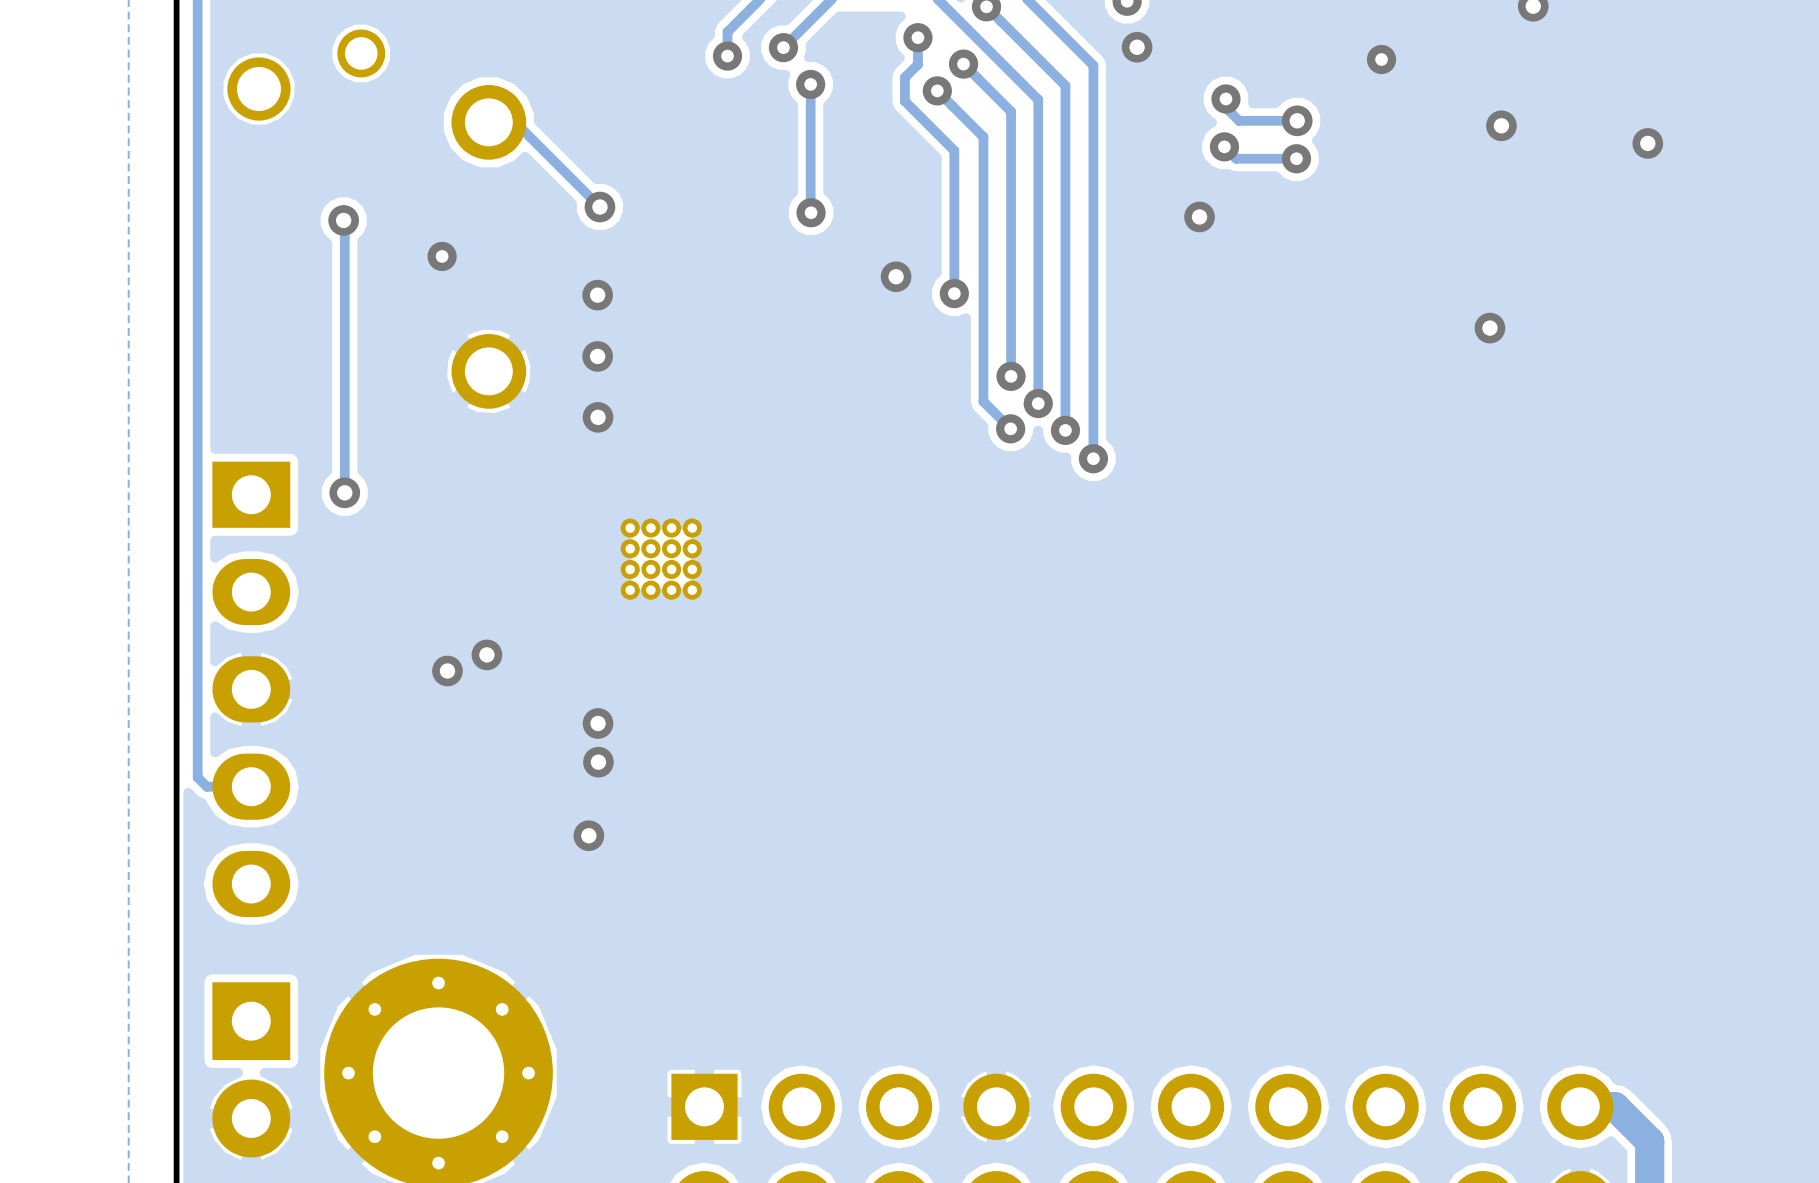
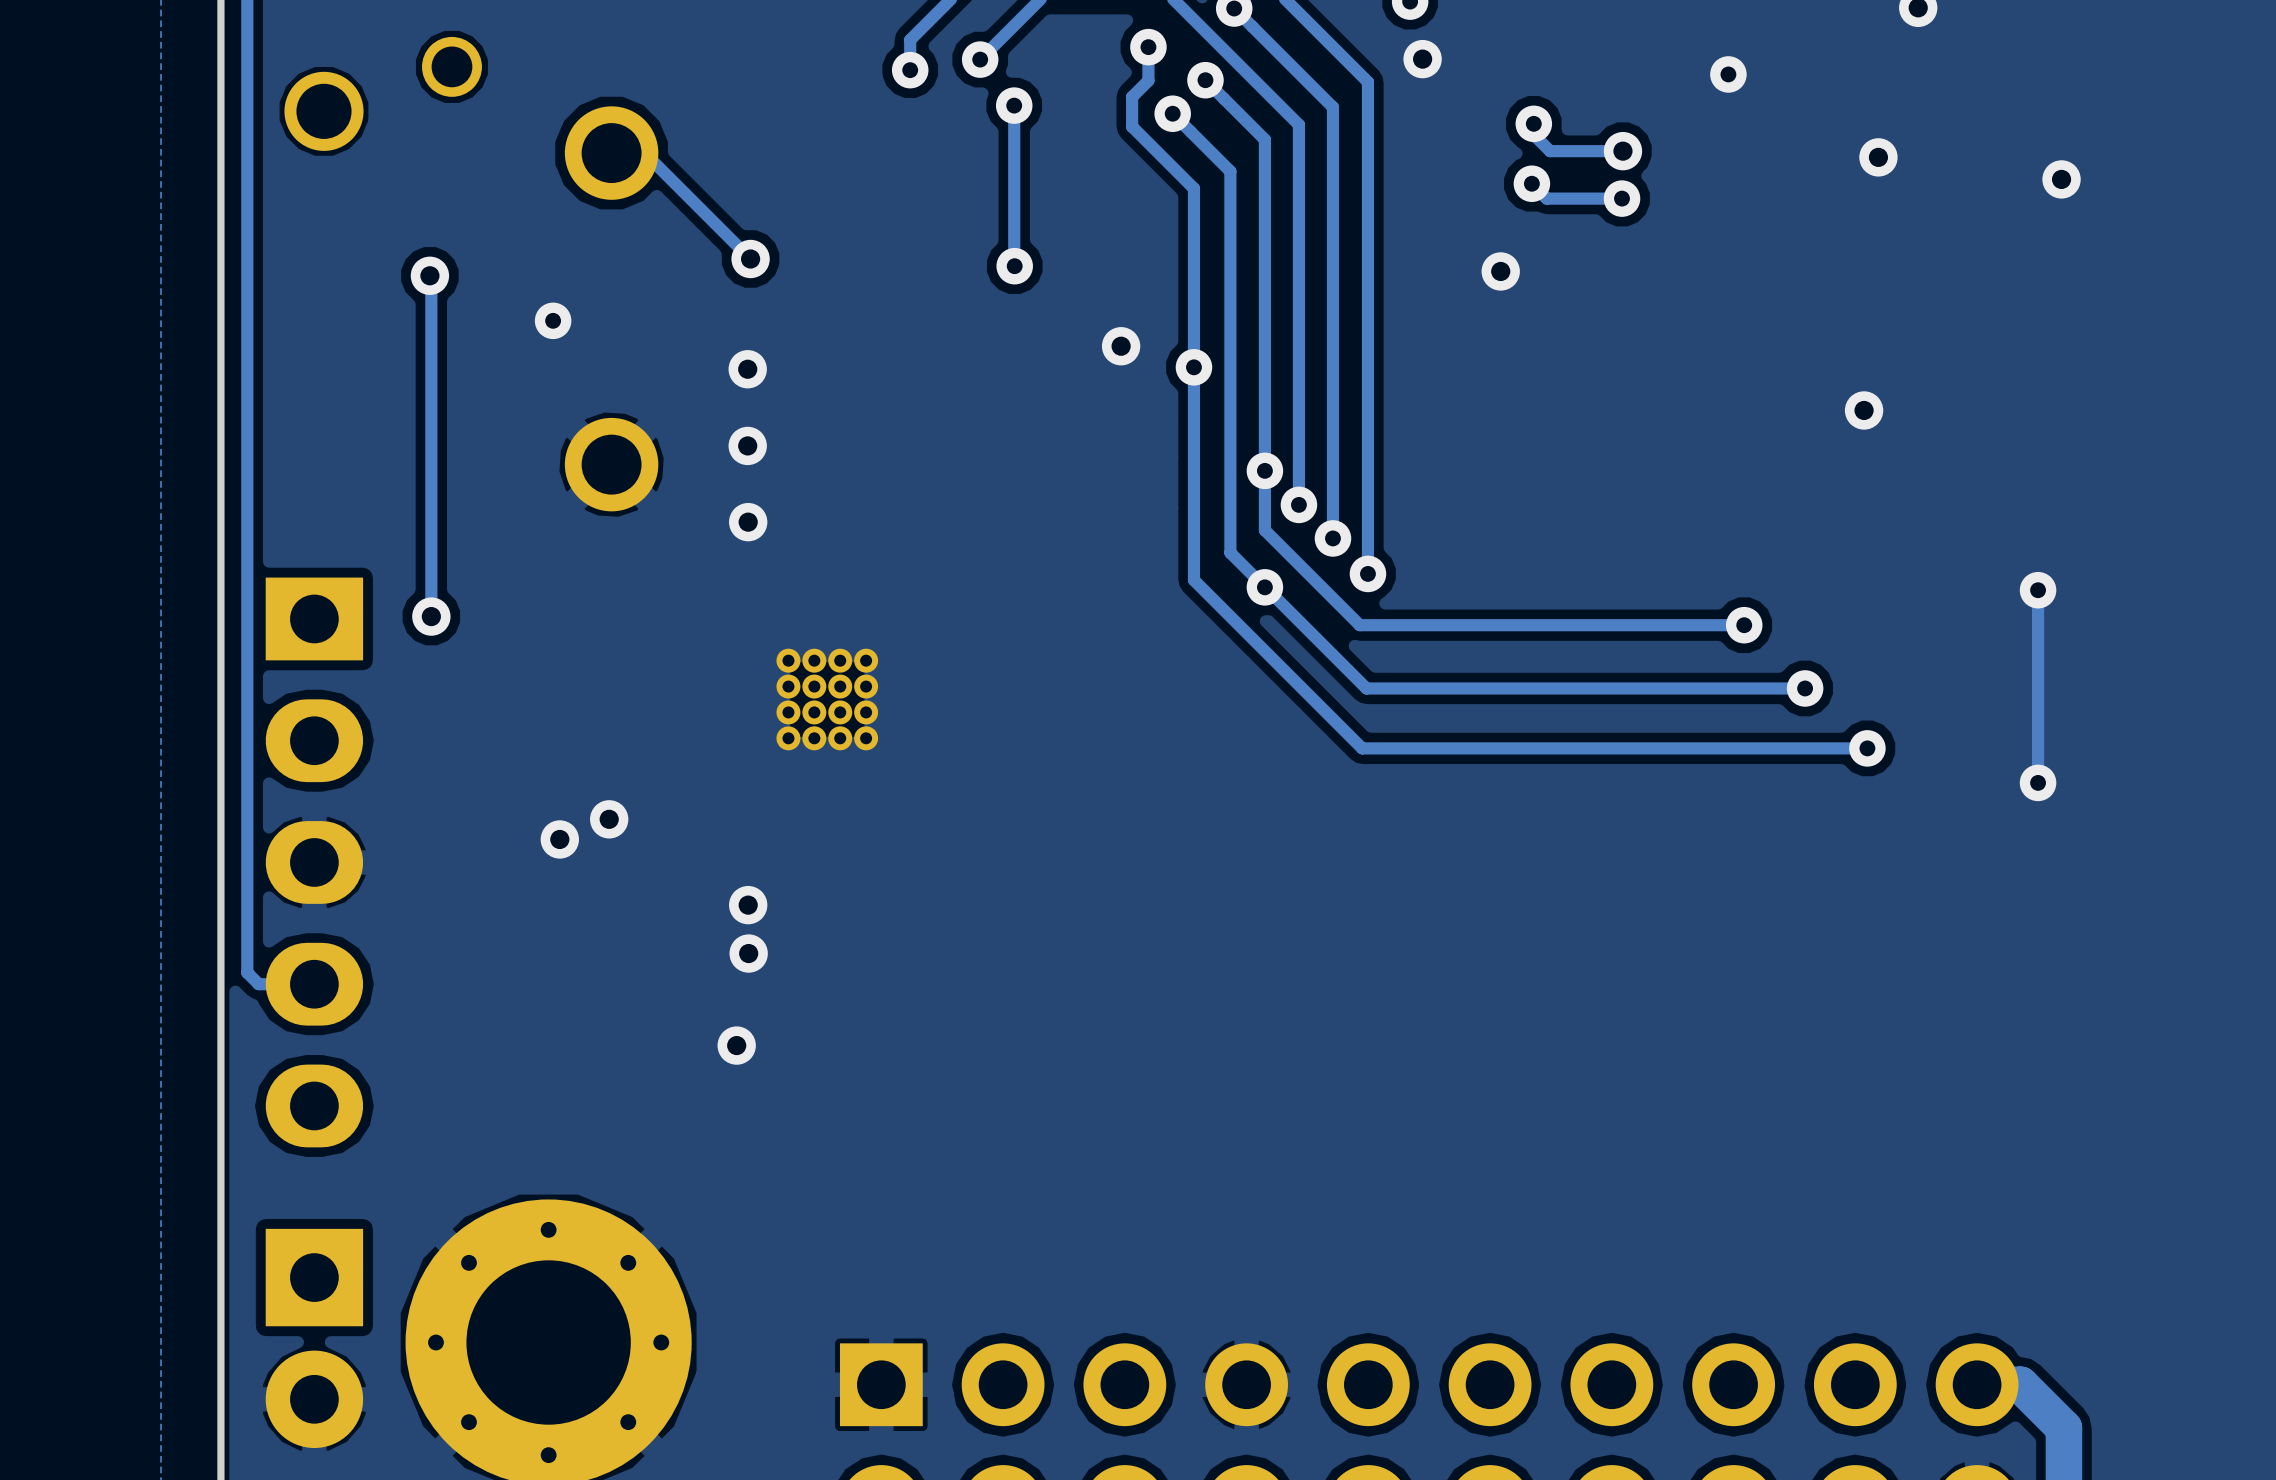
track: none -> (1193, 367) (1193, 580) (1362, 748) (1867, 748)
track: none -> (1264, 470) (1264, 530) (1359, 625) (1744, 625)
track: (983, 401) (1010, 428) -> (1230, 502) (1230, 552) (1264, 587)
via position: (1010, 428) -> (1264, 587)
track: none -> (1265, 587) (1366, 688) (1805, 688)
track: none -> (2038, 590) (2038, 782)
via: none -> (2038, 590)
via: none -> (1744, 625)
via: none -> (1805, 688)
via: none -> (1867, 748)
via: none -> (2038, 782)

